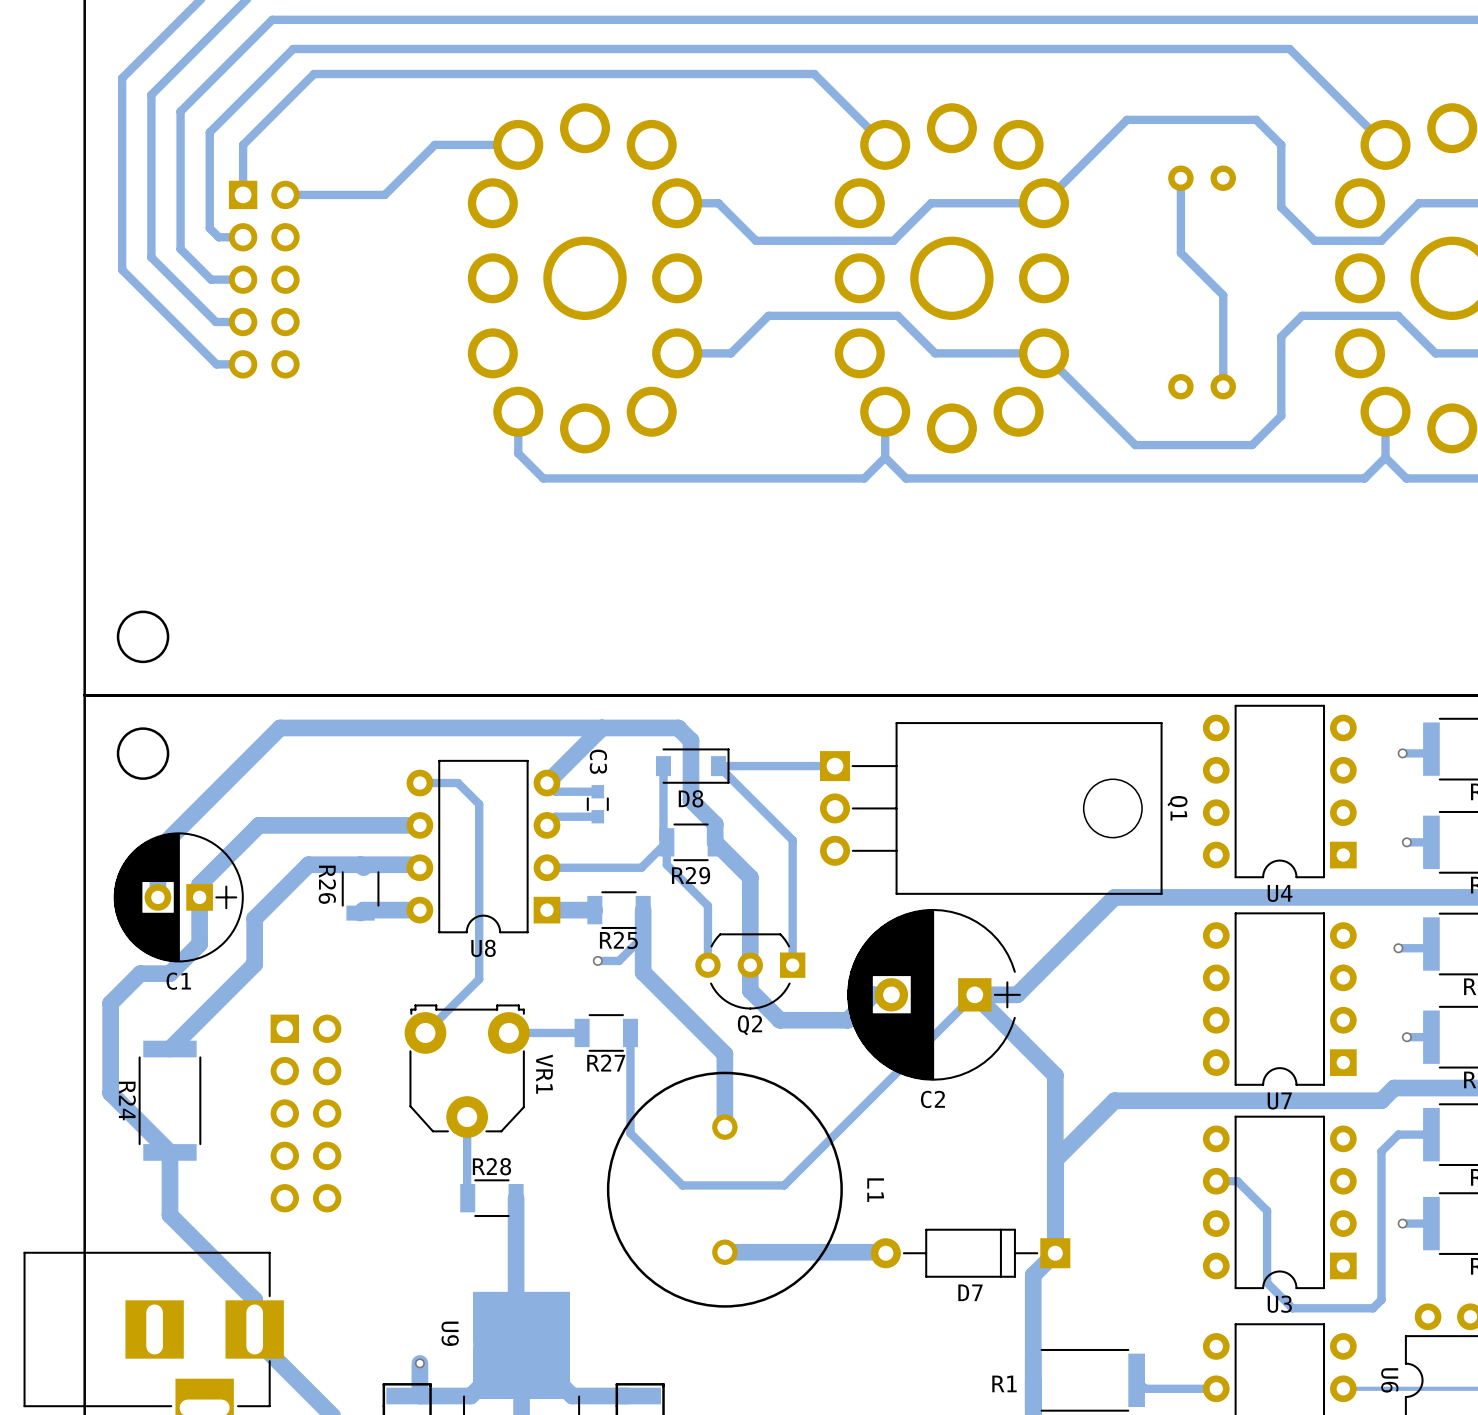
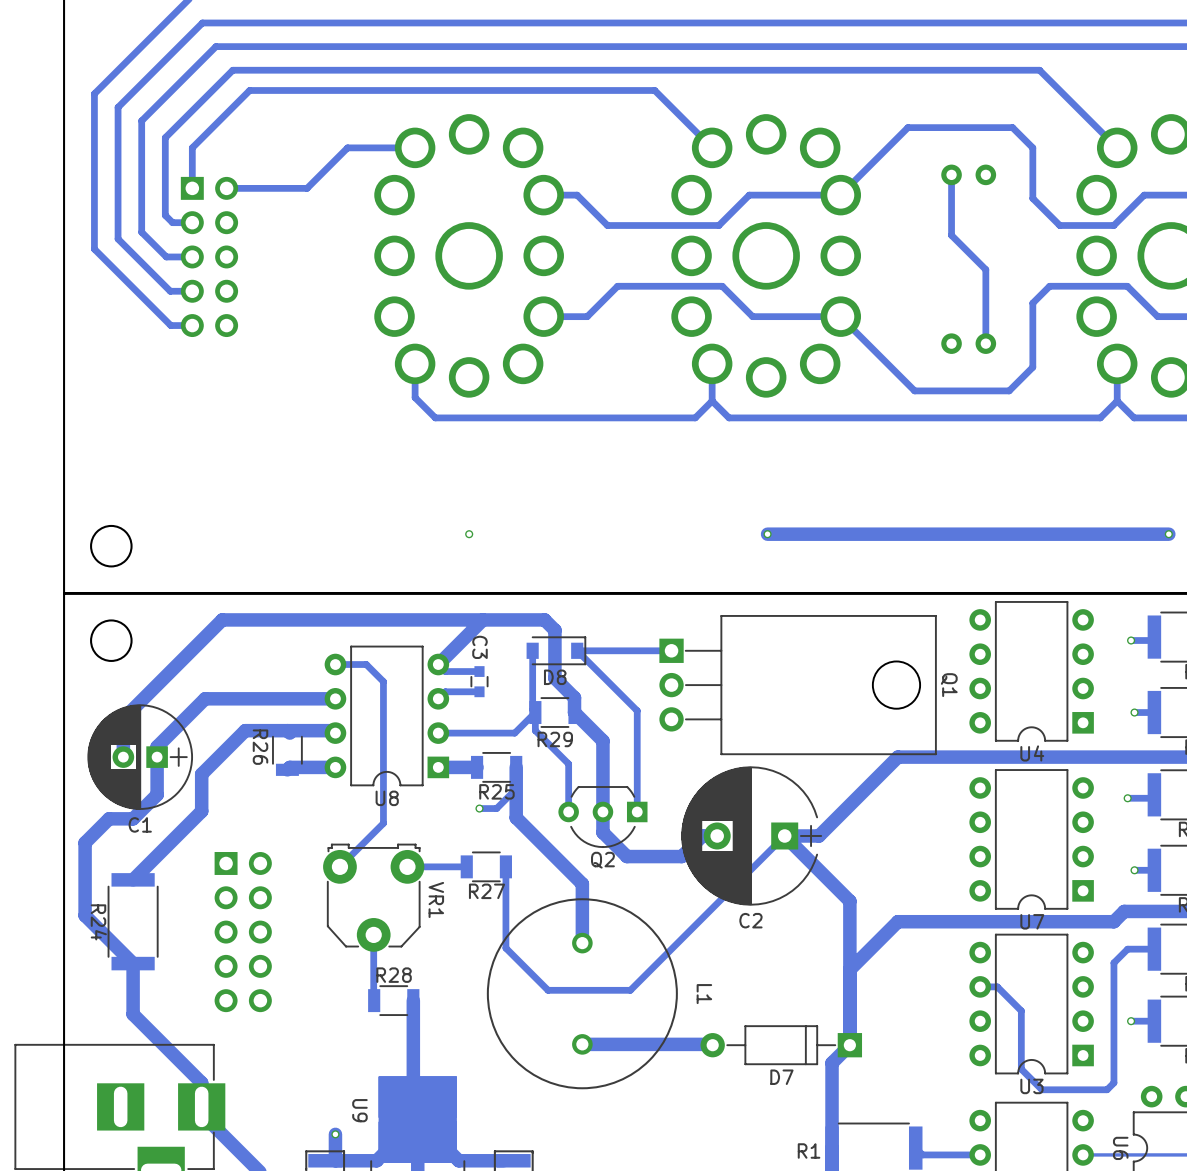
via: none -> (469, 534)
via: none -> (767, 534)
track: none -> (1168, 534) (767, 534)
via: none -> (1168, 534)

